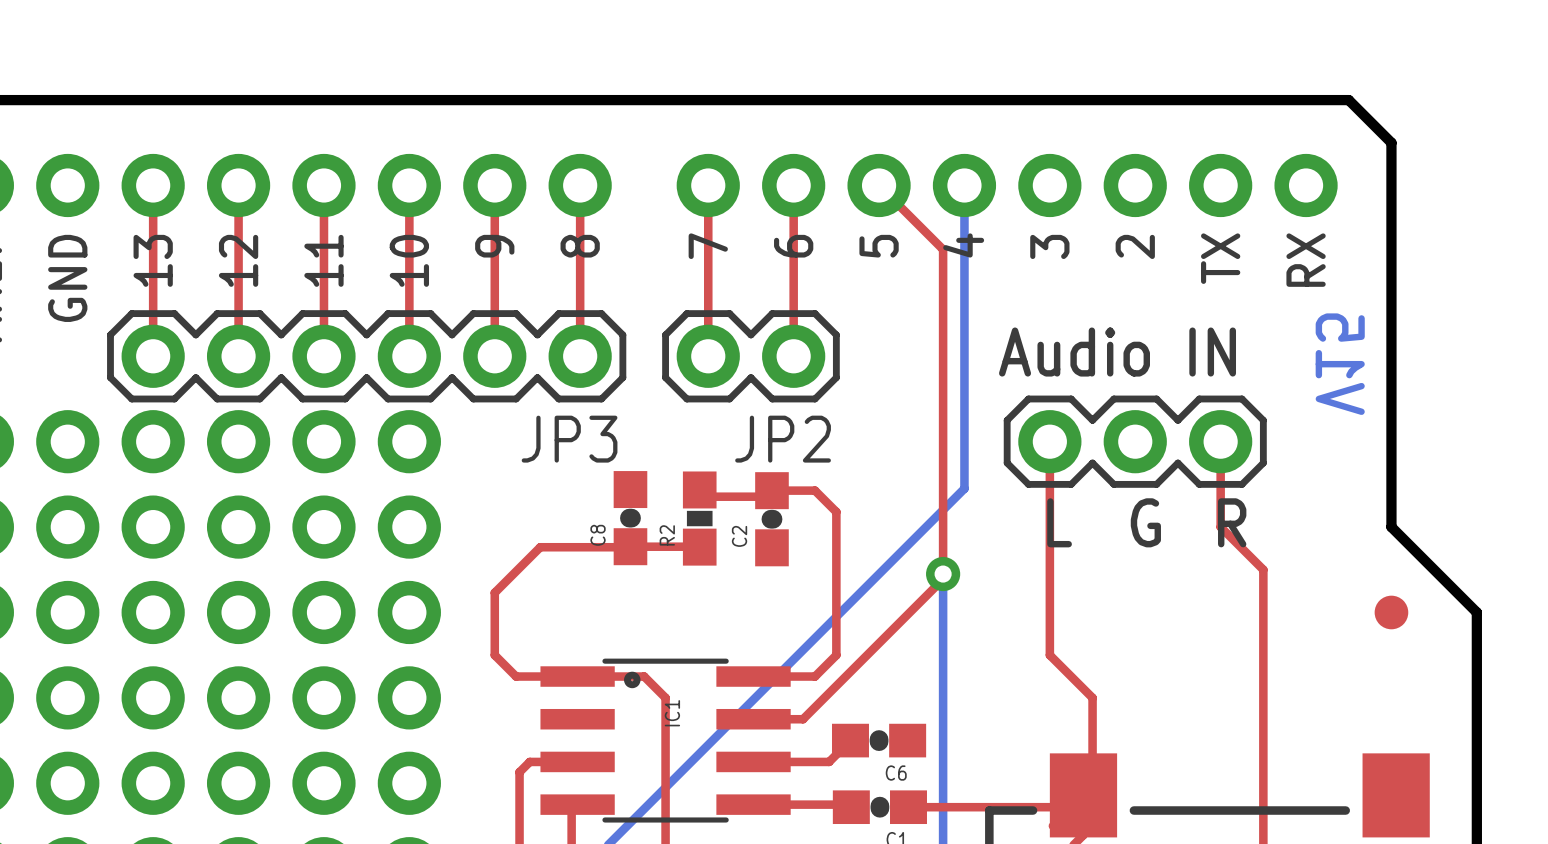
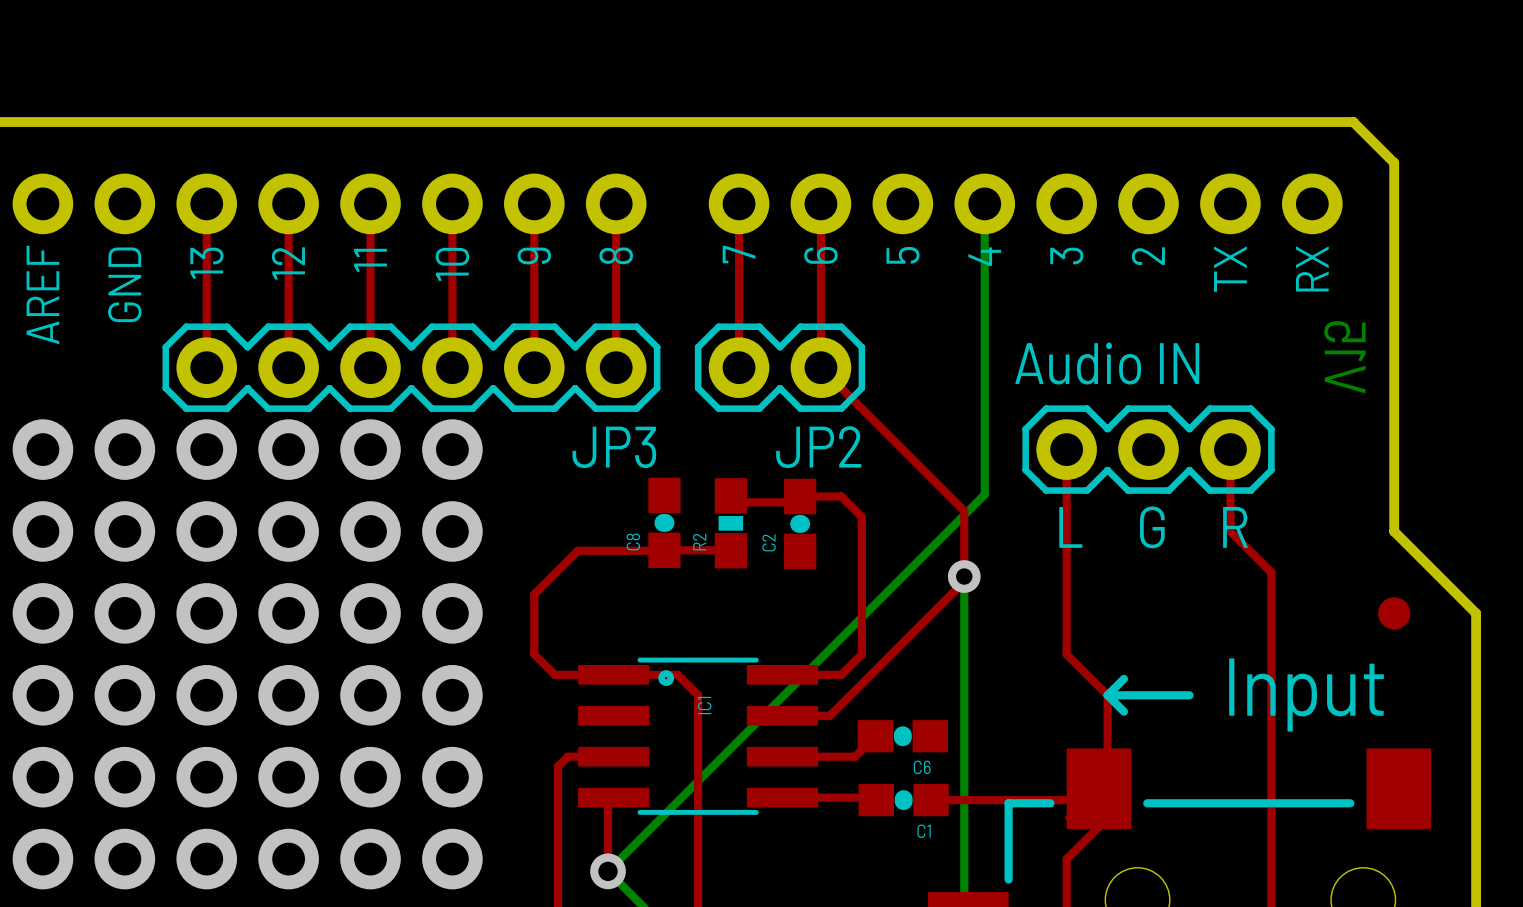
top track: (879, 185) (943, 249) (943, 505) -> (820, 367) (964, 511)
line: none -> (1123, 678) (1107, 695) (1123, 711)
line: none -> (1115, 695) (1189, 695)
text: none -> Input (1306, 695)

